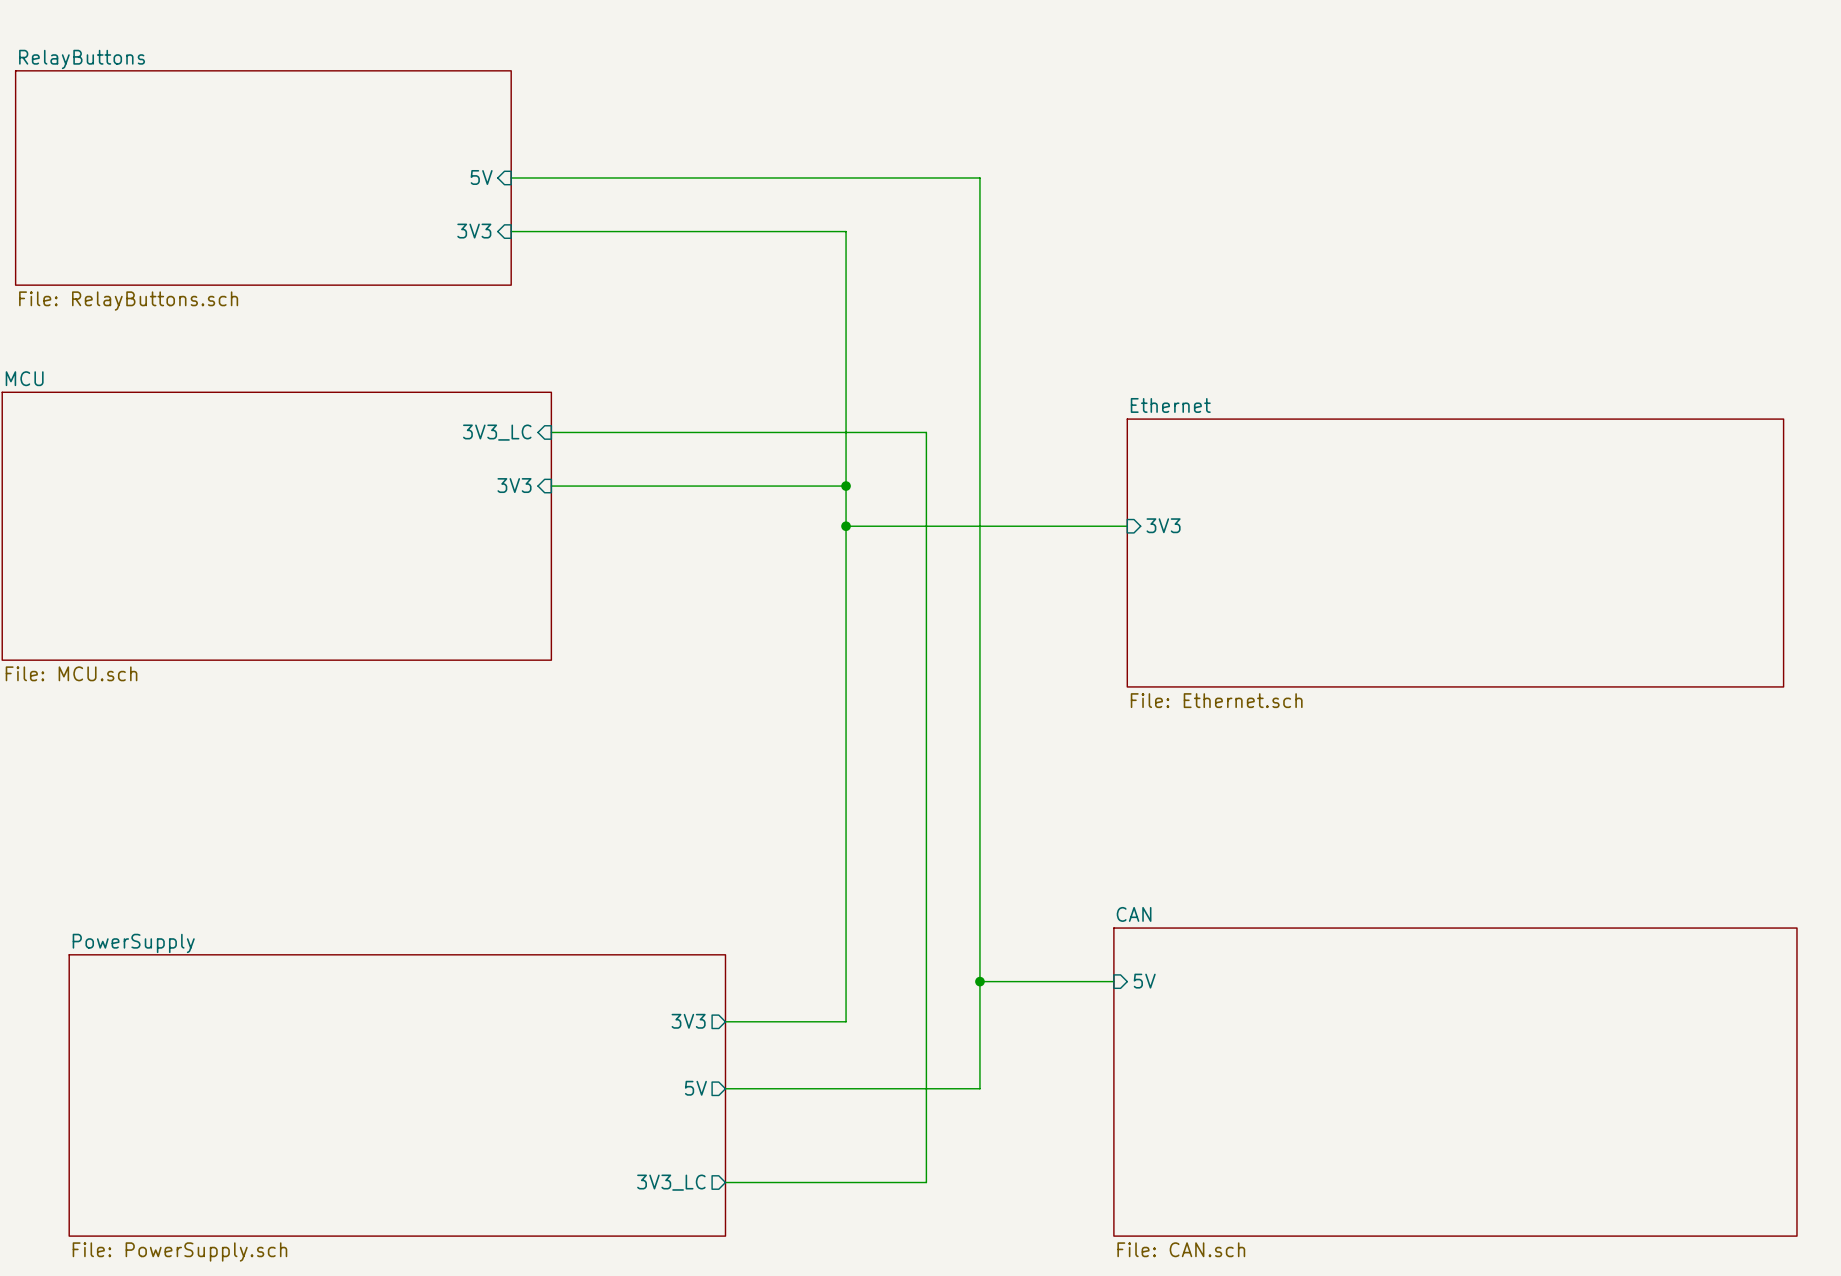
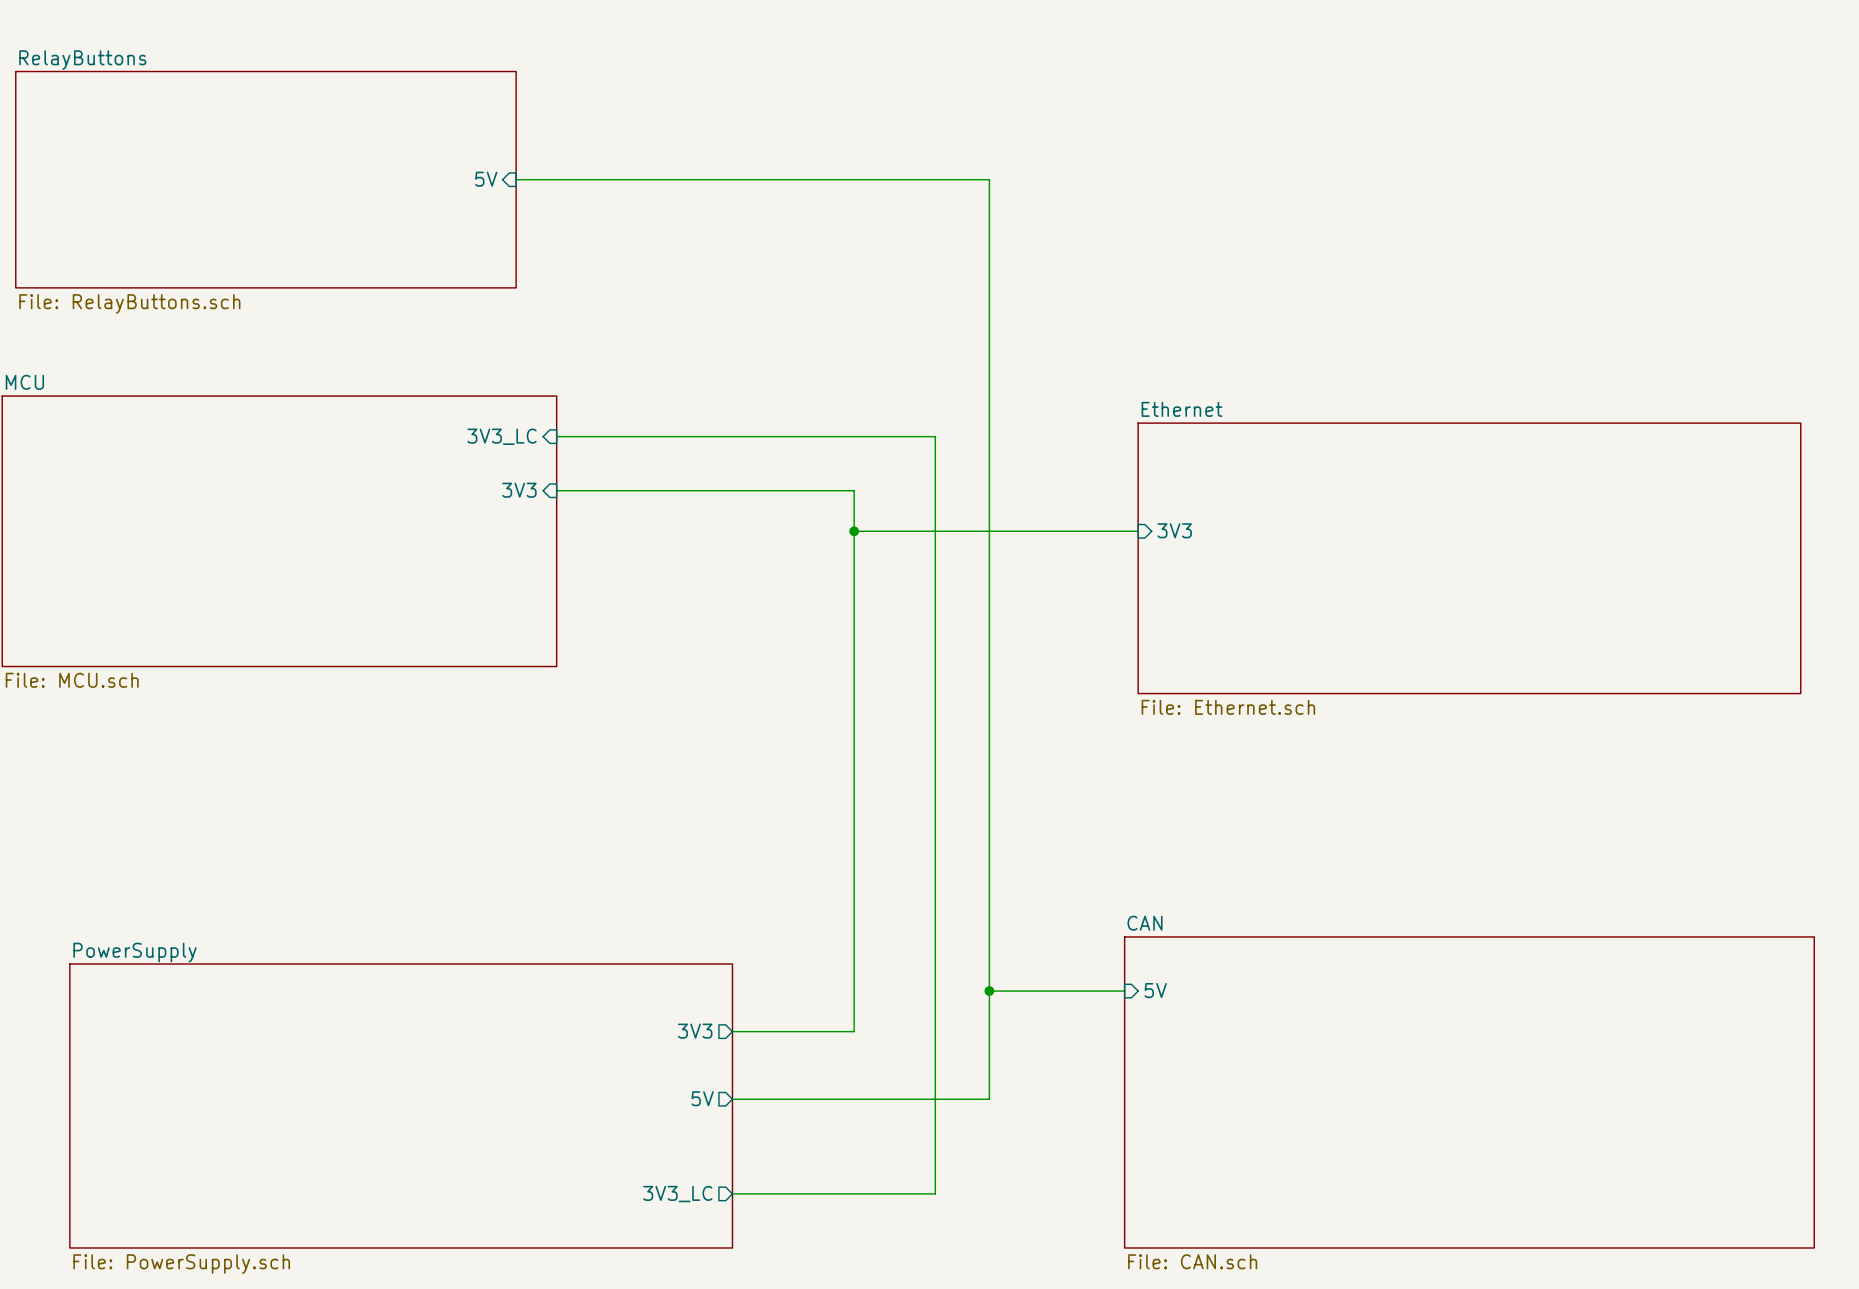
sheet pin: 3V3 (474, 231) -> none
wire: (511, 231) (846, 231) (846, 486) -> none
junction: (846, 486) -> none

